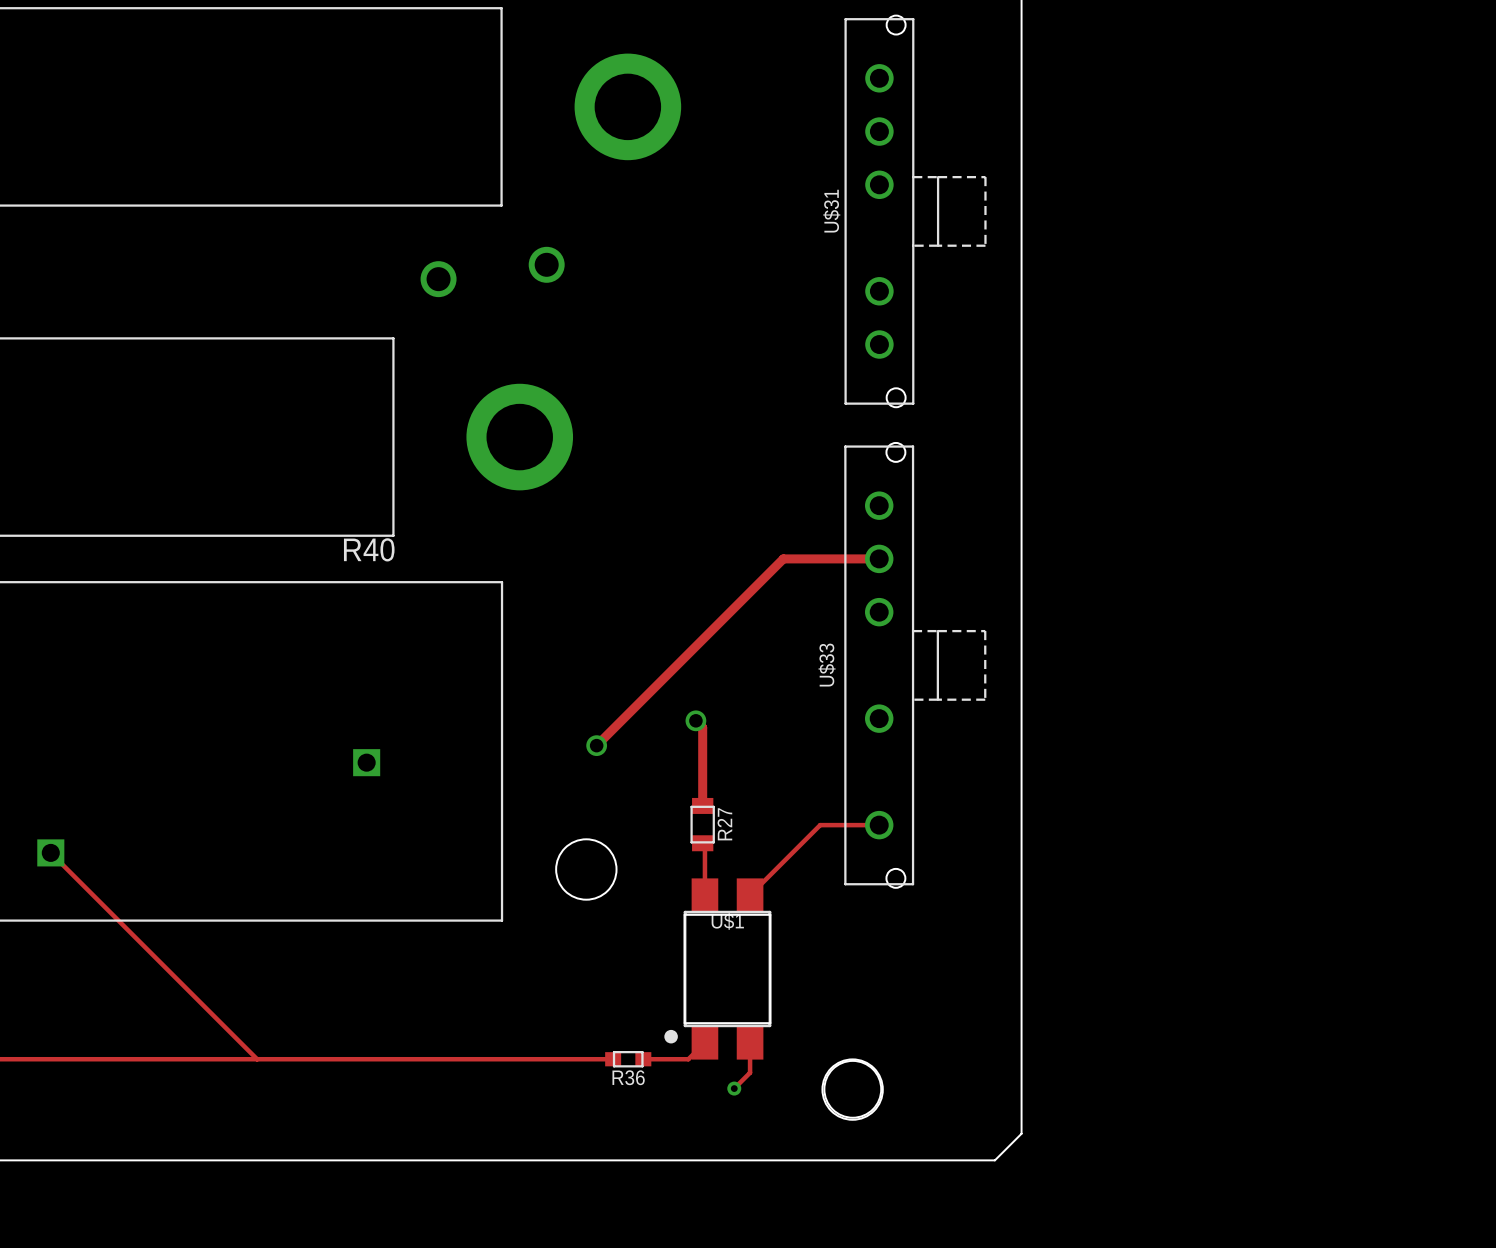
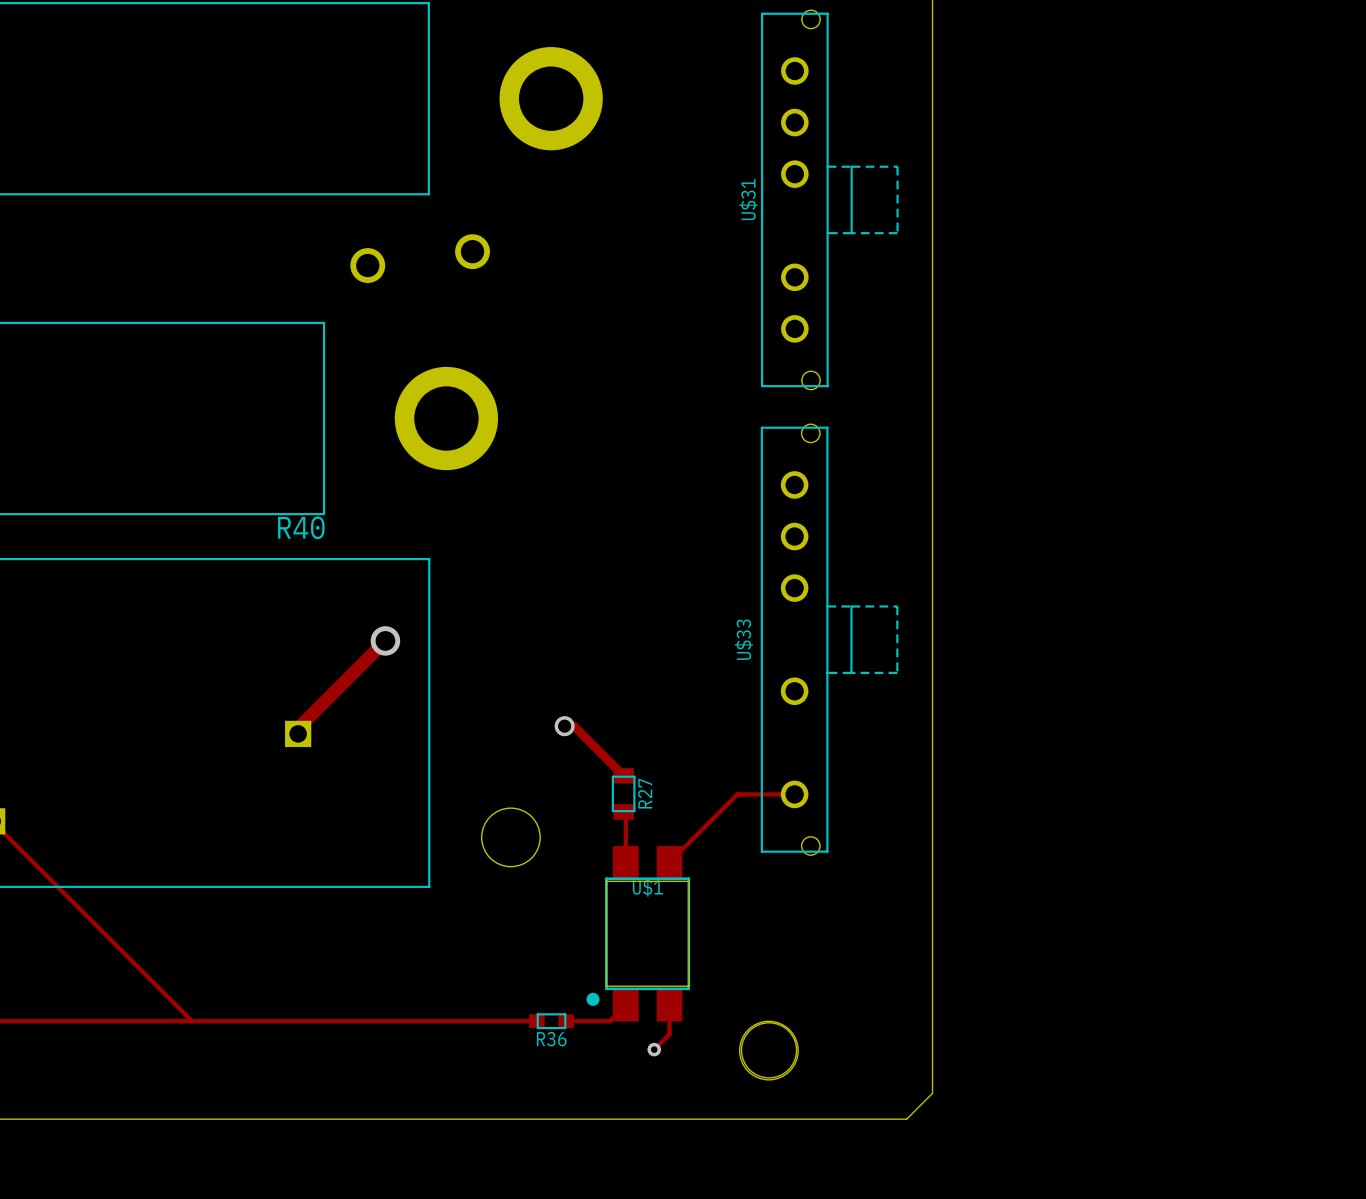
track: (879, 558) (783, 558) (596, 745) -> none
track: none -> (385, 640) (298, 728) (298, 733)
via: none -> (385, 640)
track: (695, 720) (702, 727) (702, 805) -> (564, 726) (573, 726) (623, 775)
via: (695, 720) -> none
via: (596, 745) -> none
via: none -> (564, 726)

